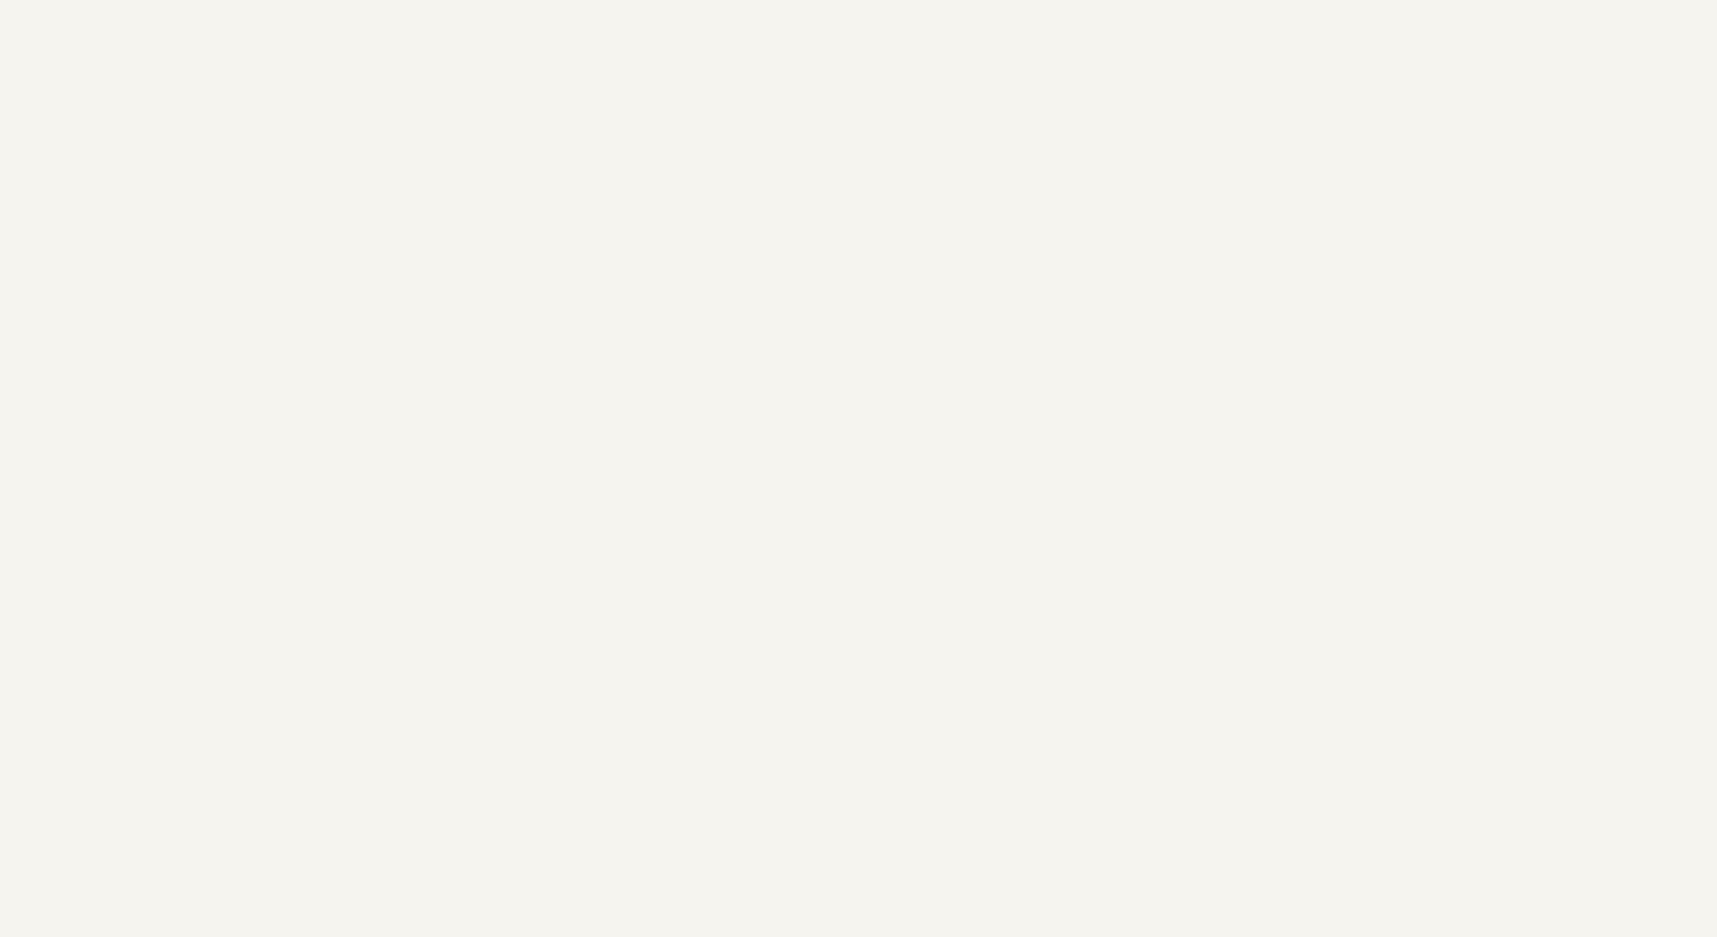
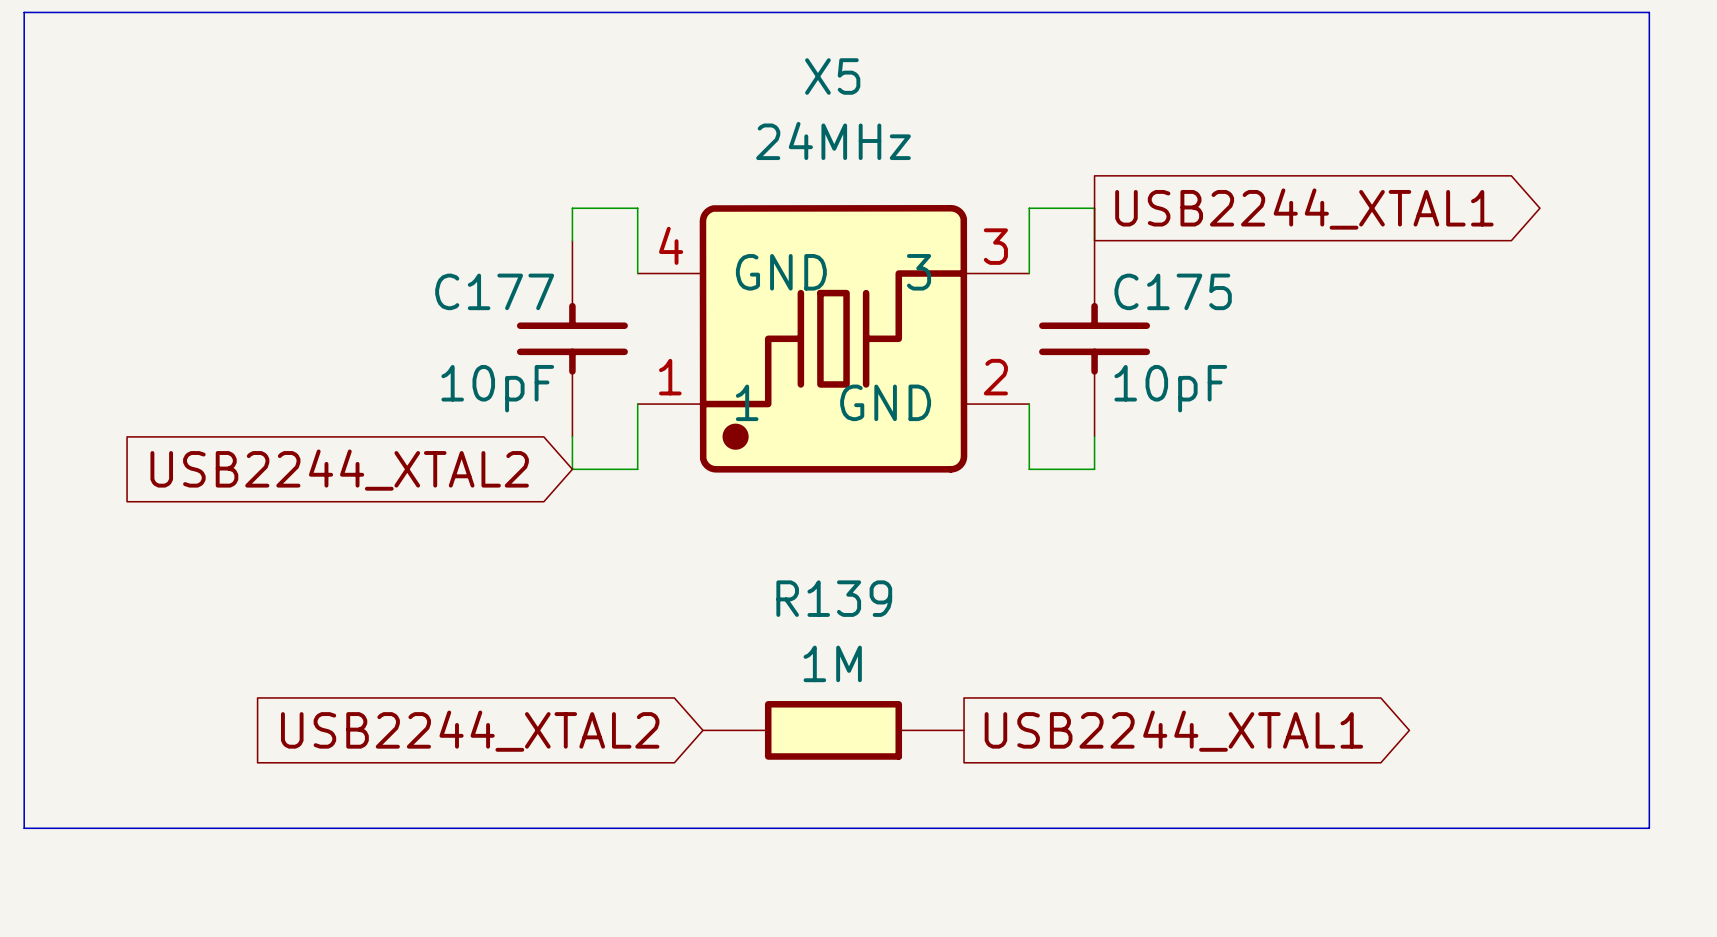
line: none -> (24, 12) (1649, 12) (1649, 828) (24, 828) (24, 12)
global label: none -> USB2244_XTAL1 (1304, 209)
wire: none -> (572, 240) (572, 208) (637, 208) (637, 273)
wire: none -> (1094, 240) (1094, 208) (1029, 208) (1029, 273)
C177: none -> 10pF (572, 338)
X5: none -> 24MHz (833, 338)
C175: none -> 10pF (1094, 338)
wire: none -> (637, 404) (637, 469) (572, 469) (572, 436)
wire: none -> (1029, 404) (1029, 469) (1094, 469) (1094, 436)
global label: none -> USB2244_XTAL2 (339, 470)
R139: none -> 1M (833, 730)
global label: none -> USB2244_XTAL2 (470, 731)
global label: none -> USB2244_XTAL1 (1173, 731)

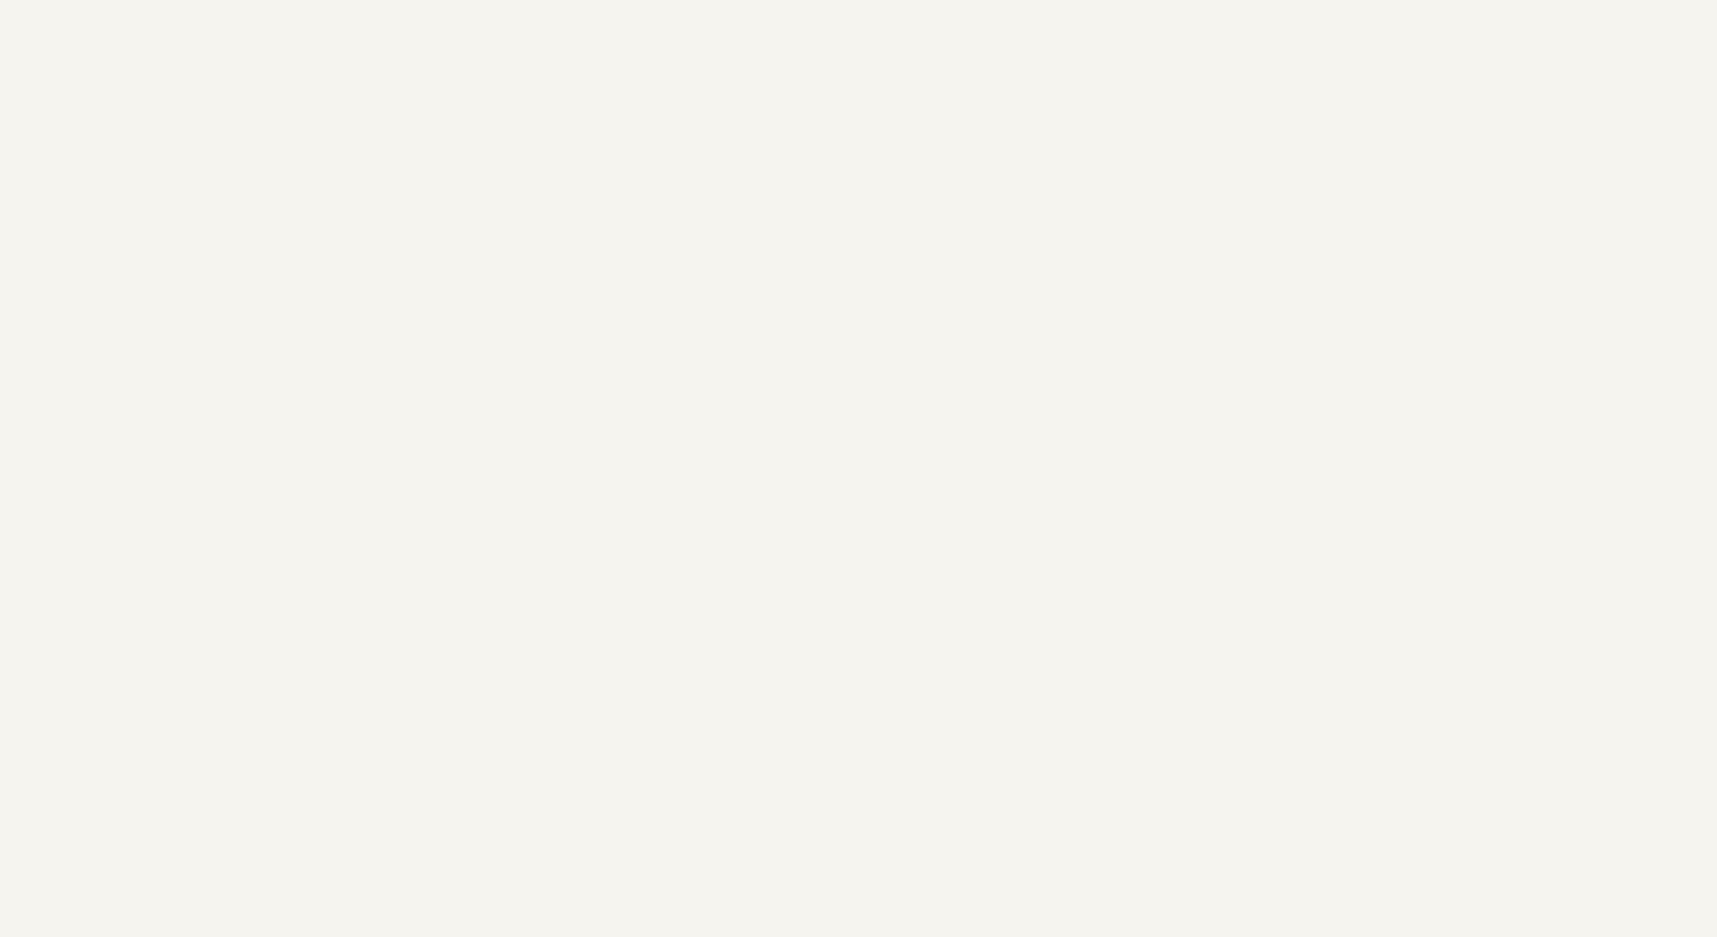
line: (24, 12) (1649, 12) (1649, 828) (24, 828) (24, 12) -> none
global label: USB2244_XTAL1 (1304, 209) -> none
wire: (572, 240) (572, 208) (637, 208) (637, 273) -> none
wire: (1094, 240) (1094, 208) (1029, 208) (1029, 273) -> none
C177: 10pF (572, 338) -> none
X5: 24MHz (833, 338) -> none
C175: 10pF (1094, 338) -> none
wire: (637, 404) (637, 469) (572, 469) (572, 436) -> none
wire: (1029, 404) (1029, 469) (1094, 469) (1094, 436) -> none
global label: USB2244_XTAL2 (339, 470) -> none
R139: 1M (833, 730) -> none
global label: USB2244_XTAL2 (470, 731) -> none
global label: USB2244_XTAL1 (1173, 731) -> none

